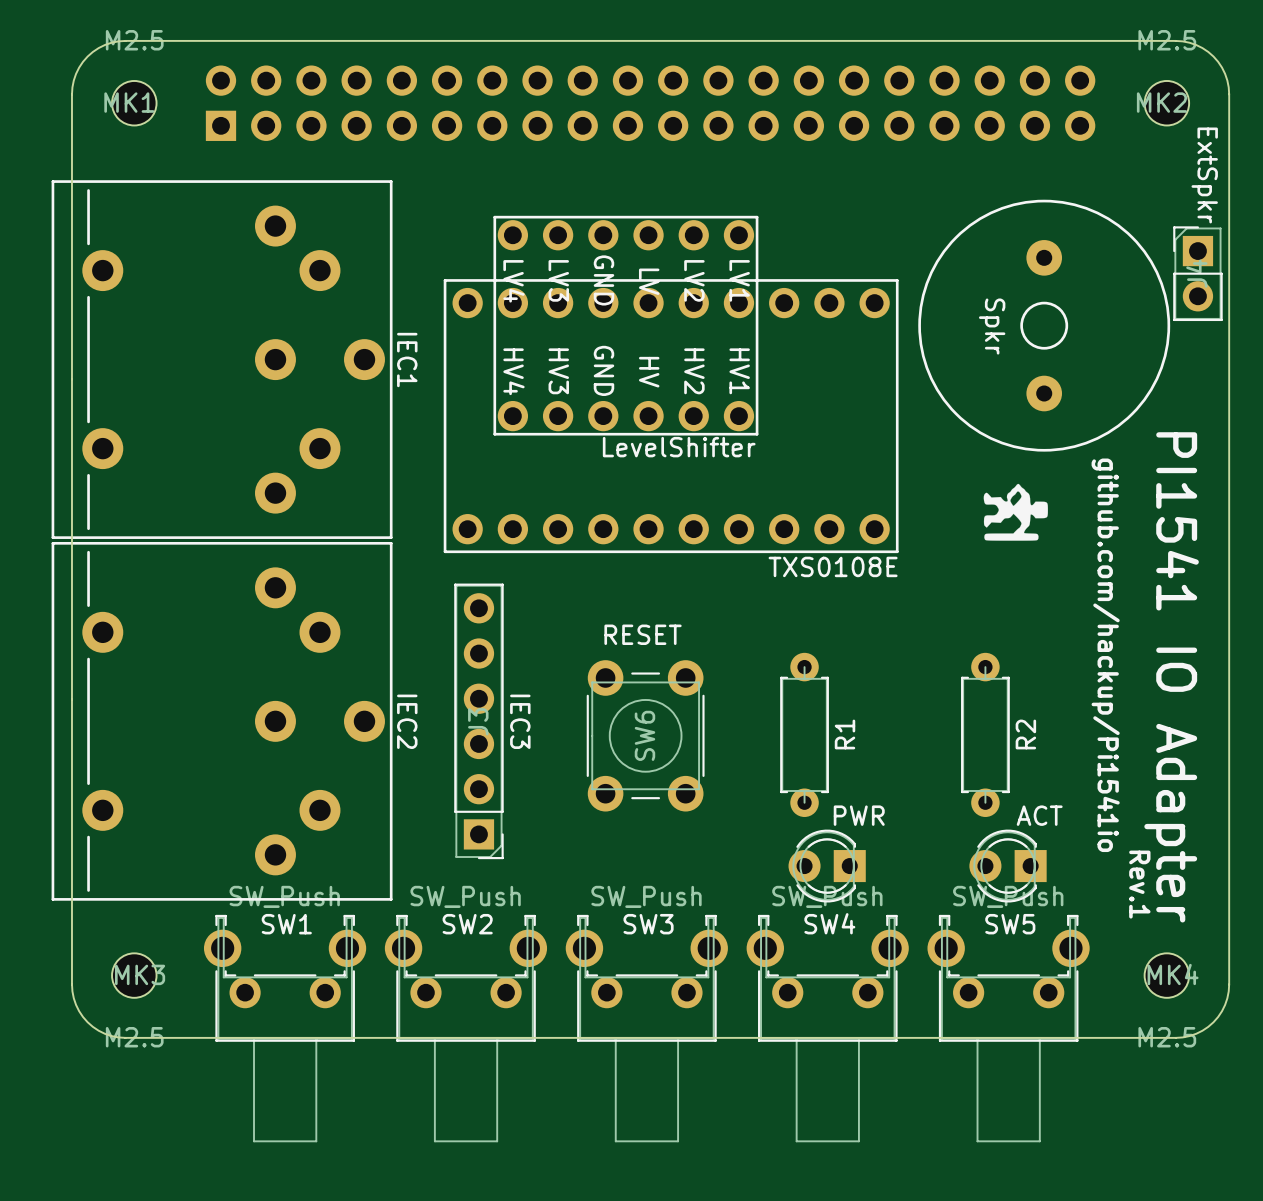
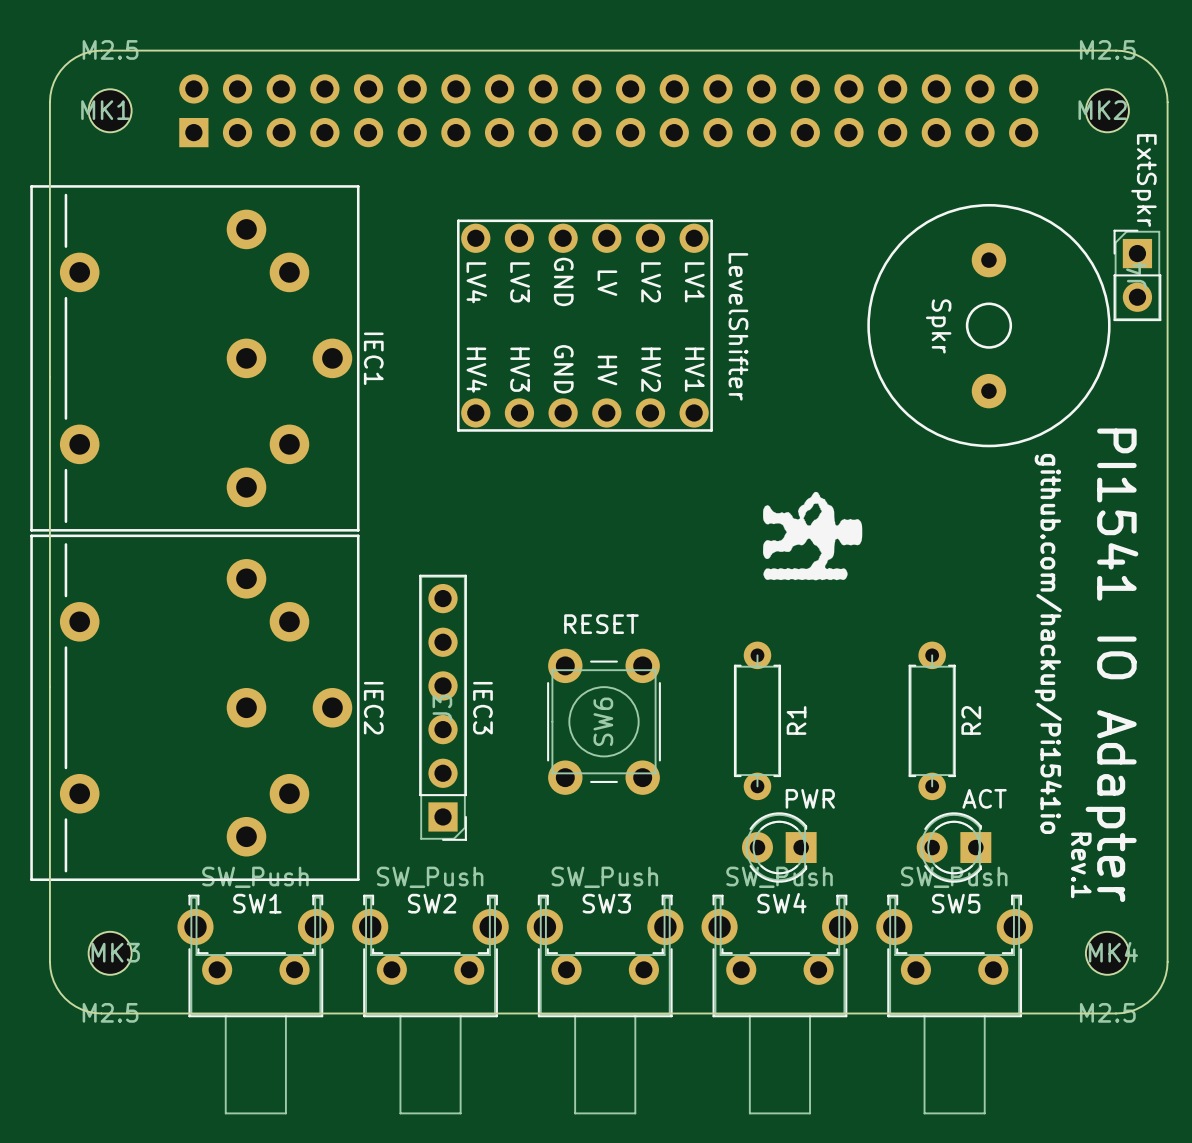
part: TXS0108E (671, 416) -> none
part value rotation: 0° (679, 447) -> 90° clockwise (738, 326)
drawing: [983, 483, 1048, 541] -> none
drawing: none -> [763, 491, 863, 581]

